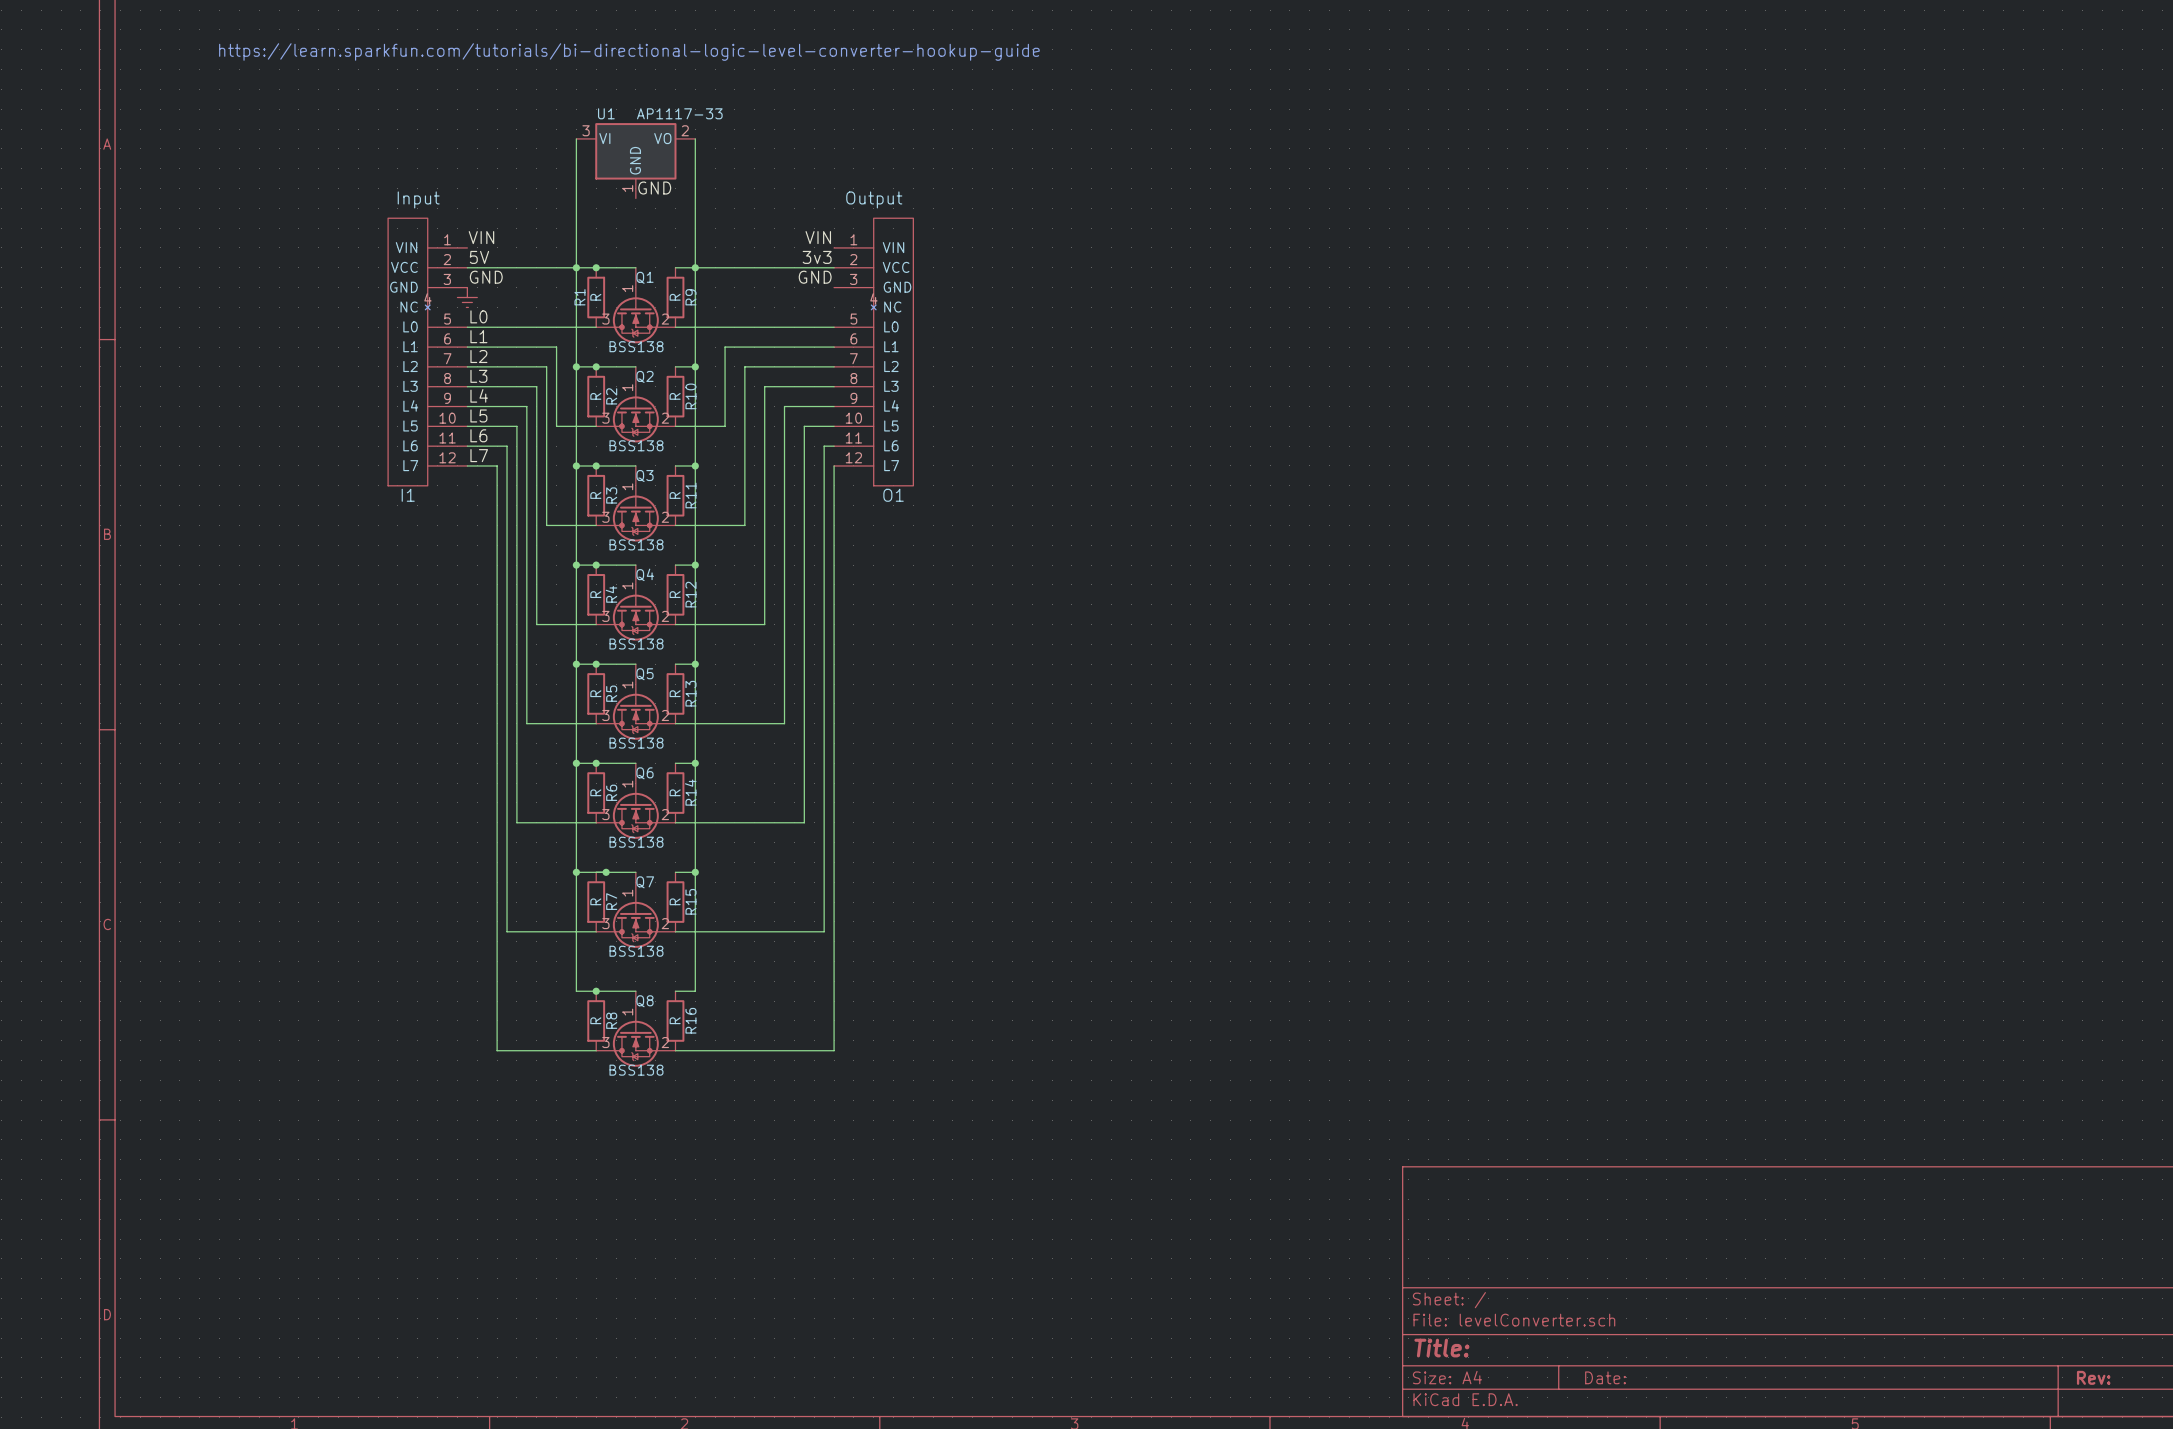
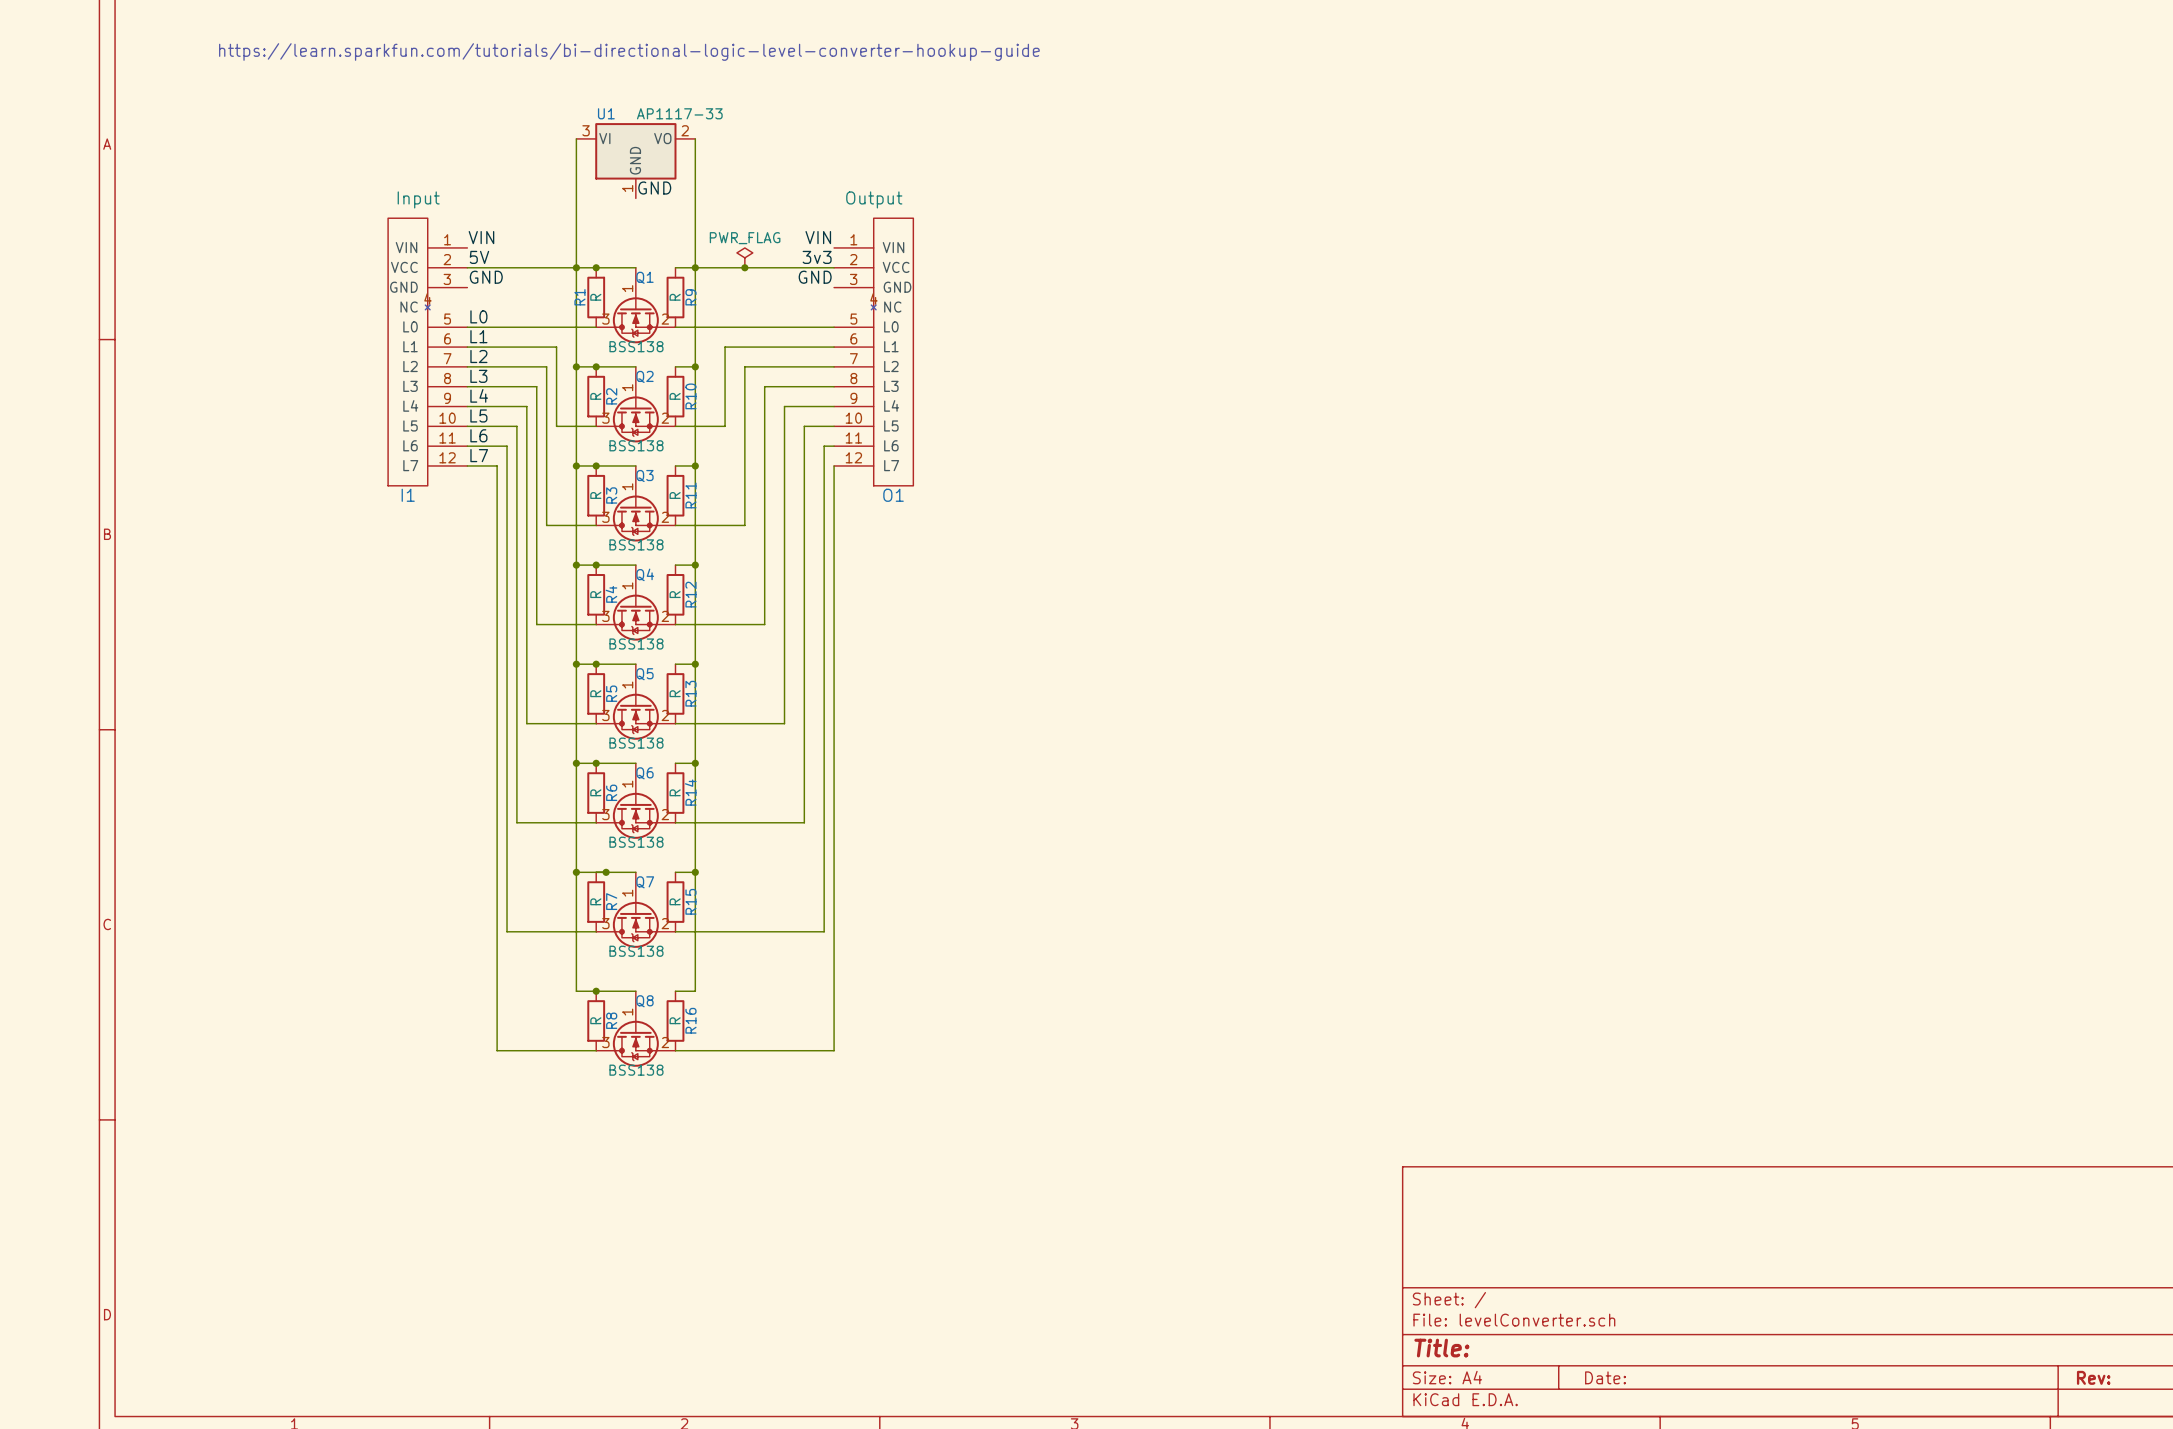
power symbol: none -> PWR_FLAG (744, 257)
junction: none -> (744, 267)
power symbol: (467, 297) -> none

